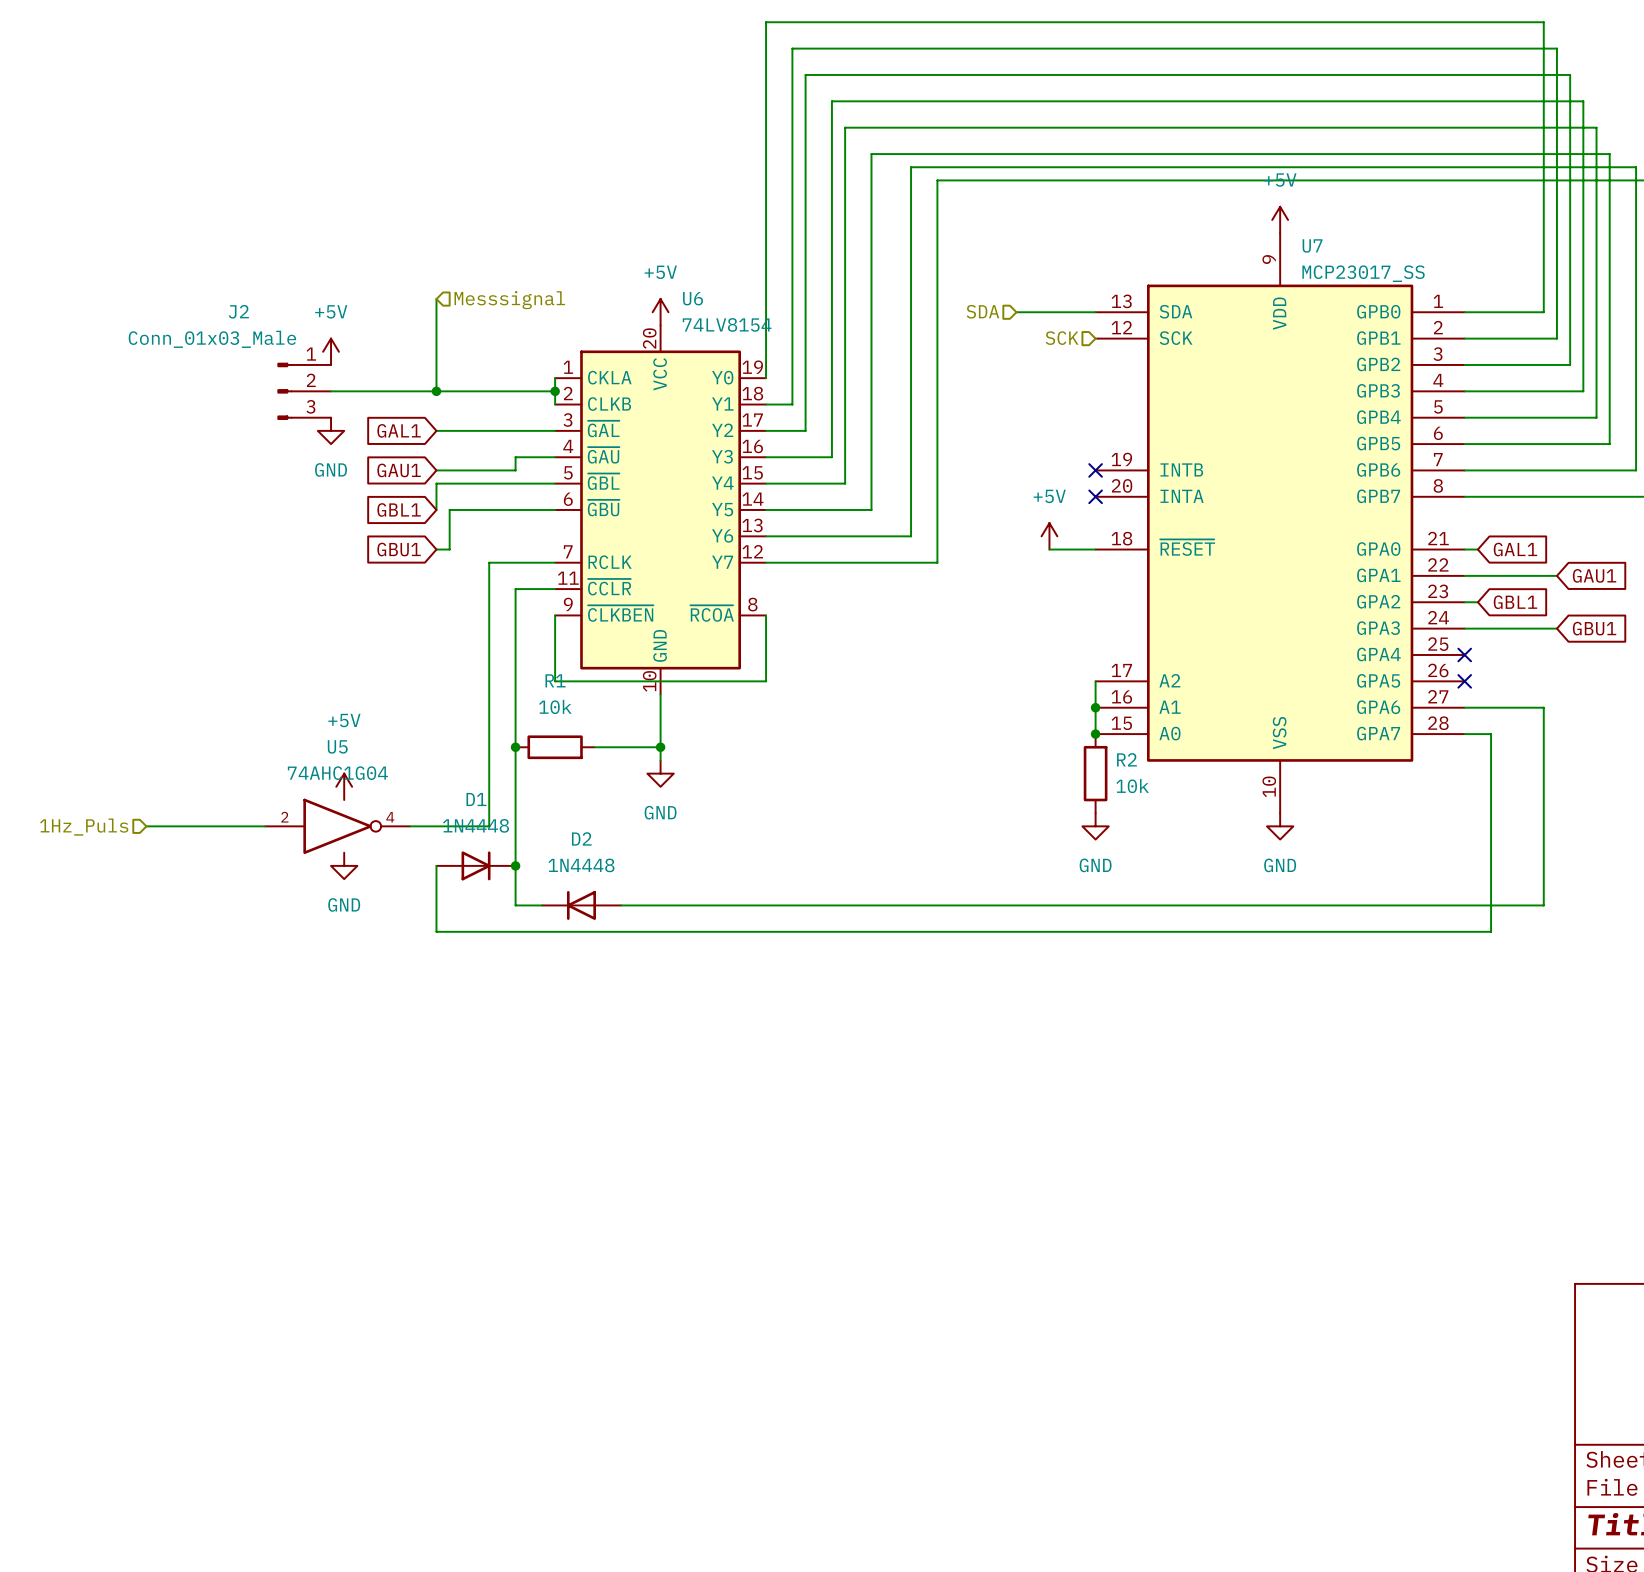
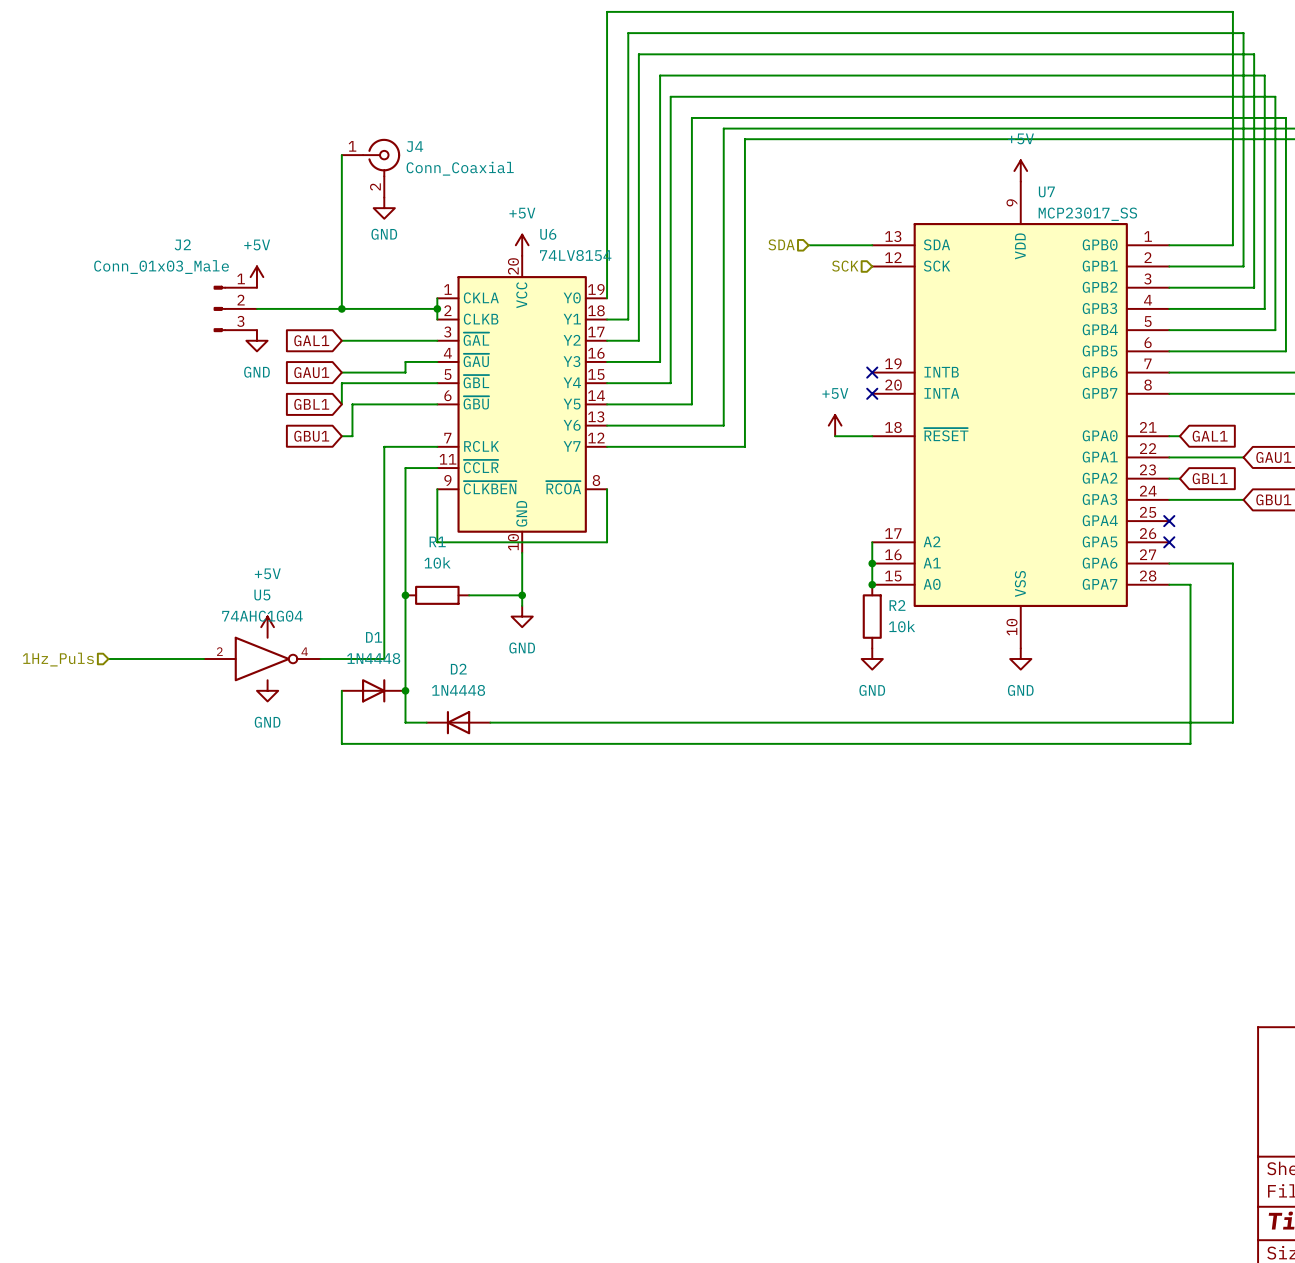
wire: none -> (341, 155) (341, 234)
J4: none -> Conn_Coaxial (371, 168)
power symbol: none -> GND (384, 208)
hierarchical label: Messsignal (509, 300) -> none

